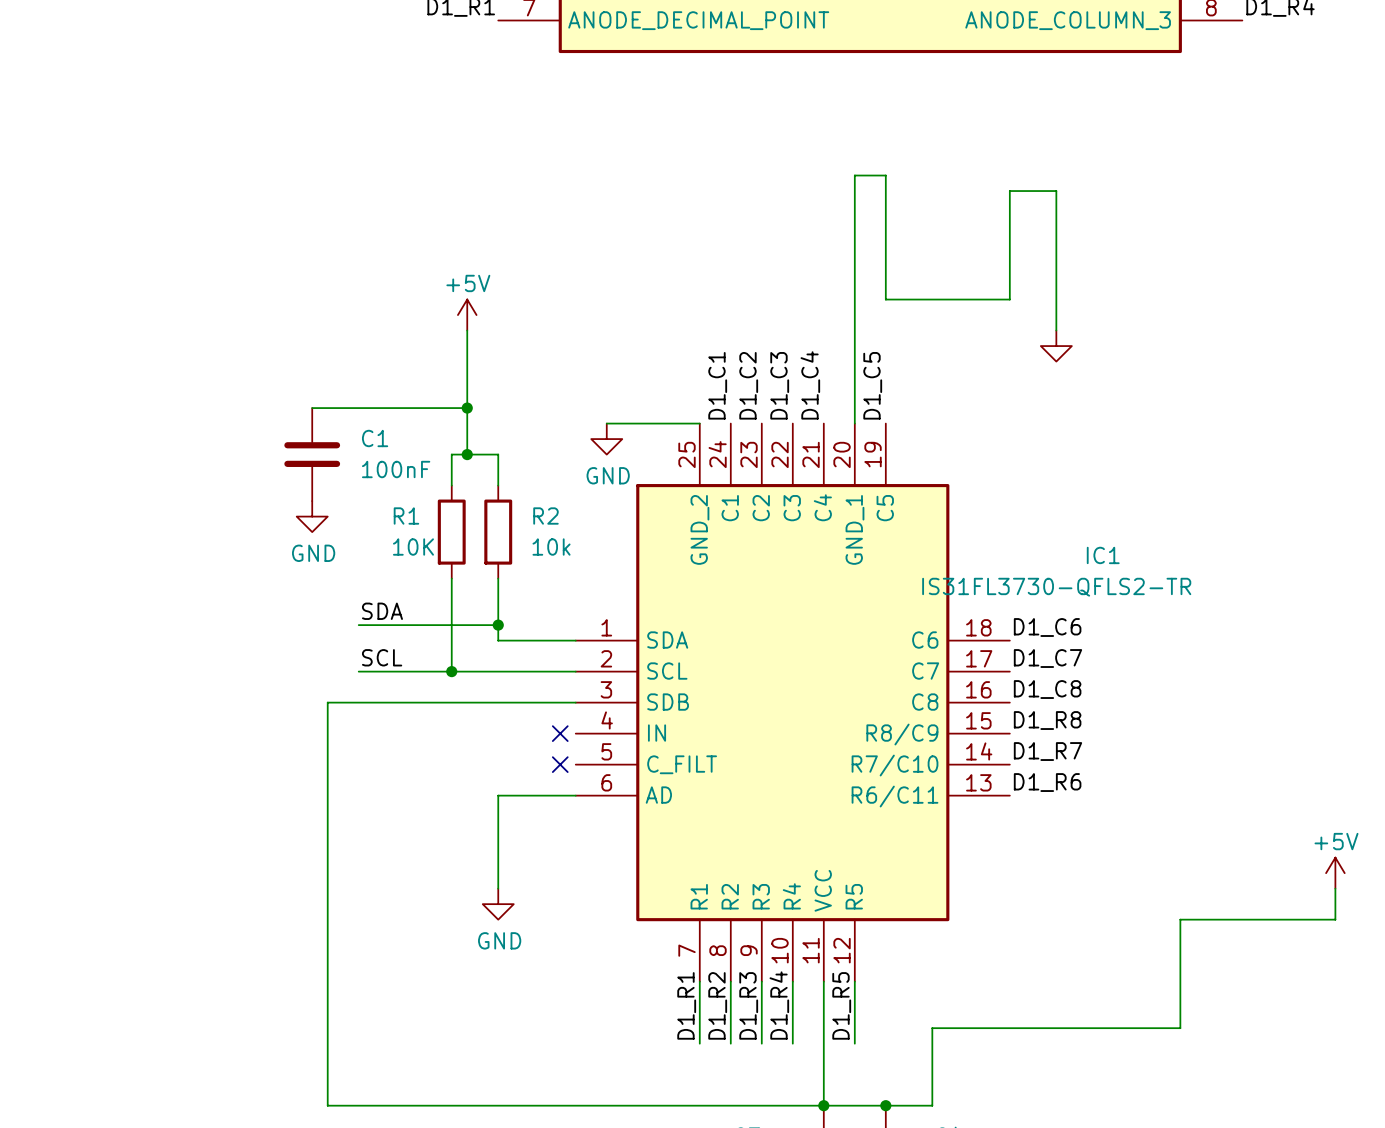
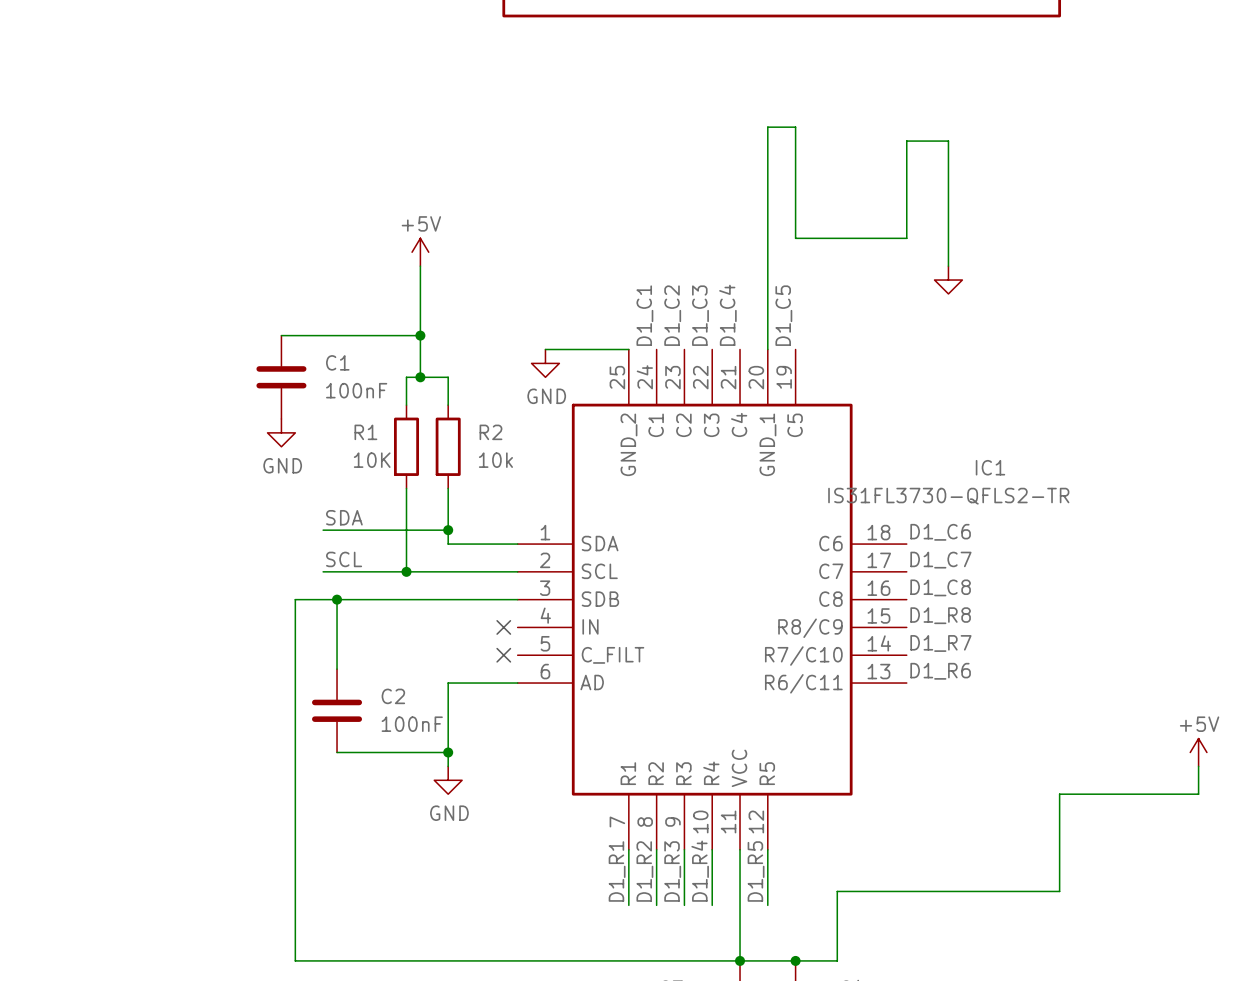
wire: none -> (337, 599) (337, 669)
junction: none -> (337, 599)
C2: none -> 100nF (337, 710)
wire: none -> (337, 752) (448, 752)
junction: none -> (448, 752)

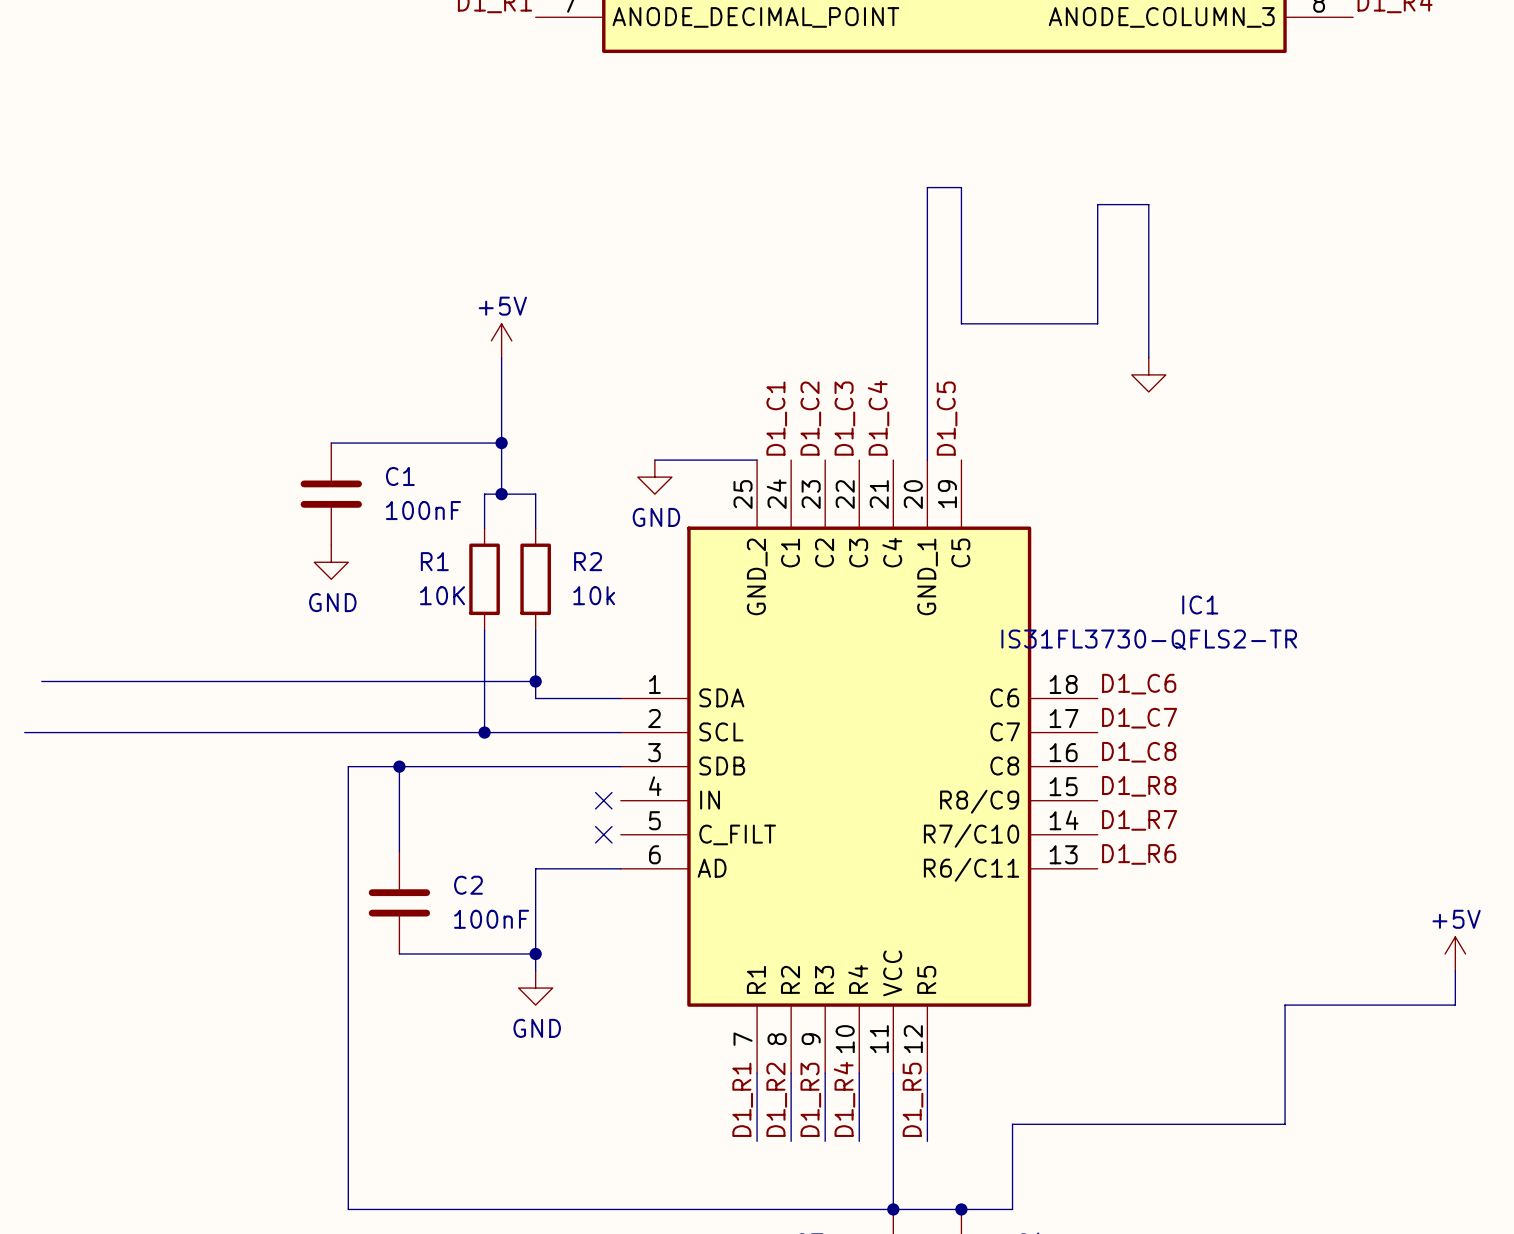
label: SDA (344, 517) -> none
wire: none -> (41, 681) (382, 681)
label: SCL (344, 559) -> none
wire: none -> (24, 732) (382, 732)

